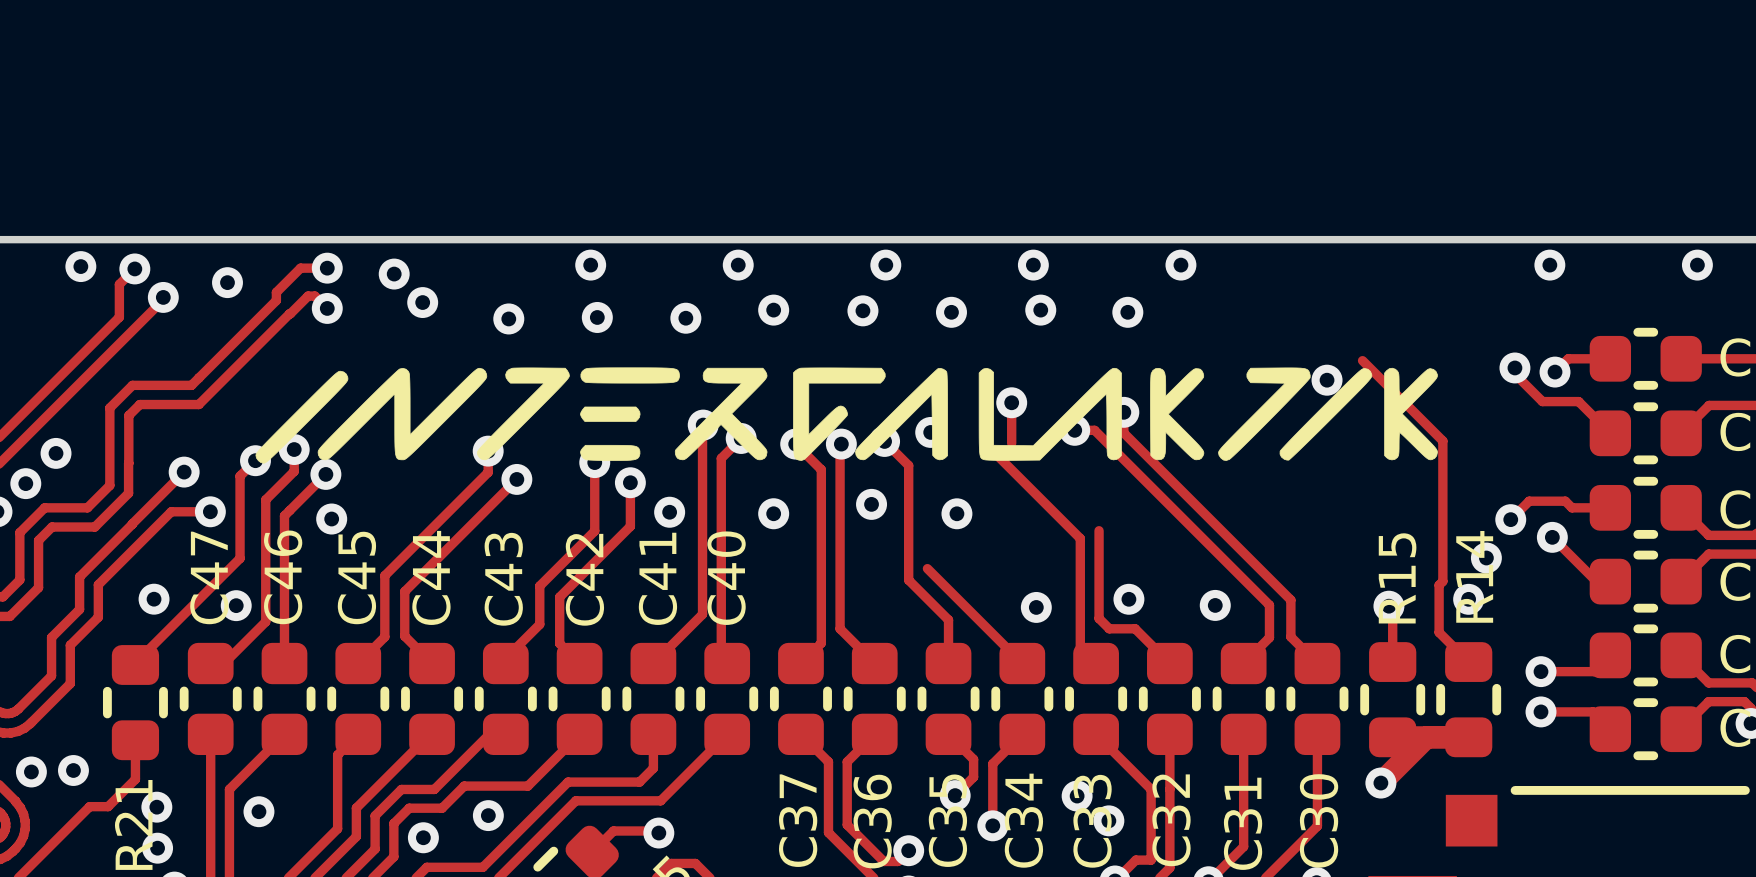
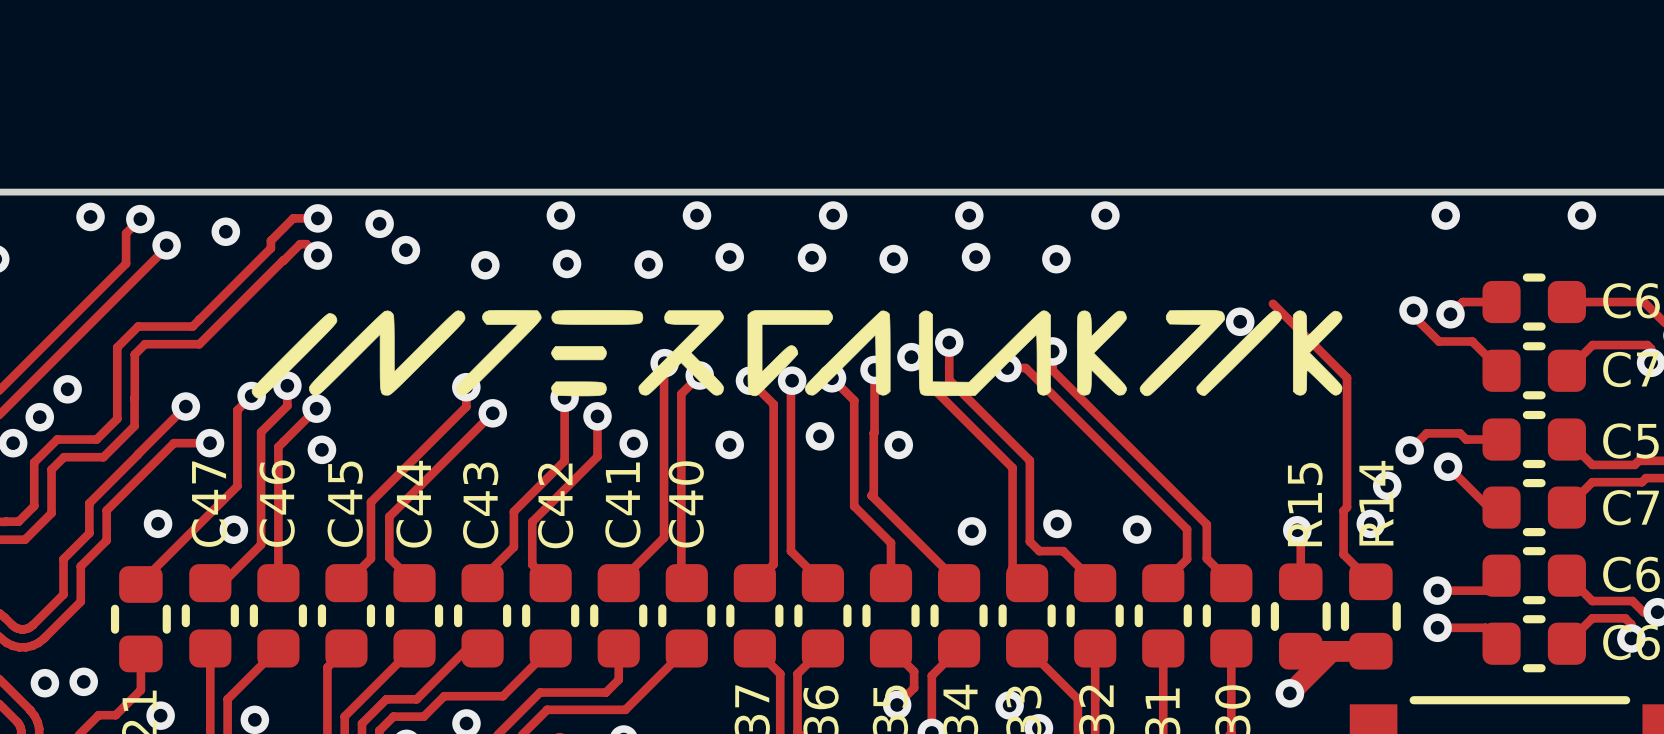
via: none -> (911, 357)
track: none -> (874, 369) (874, 432)
track: none -> (949, 380) (1029, 460)
track: none -> (873, 433) (873, 493) (871, 495)

